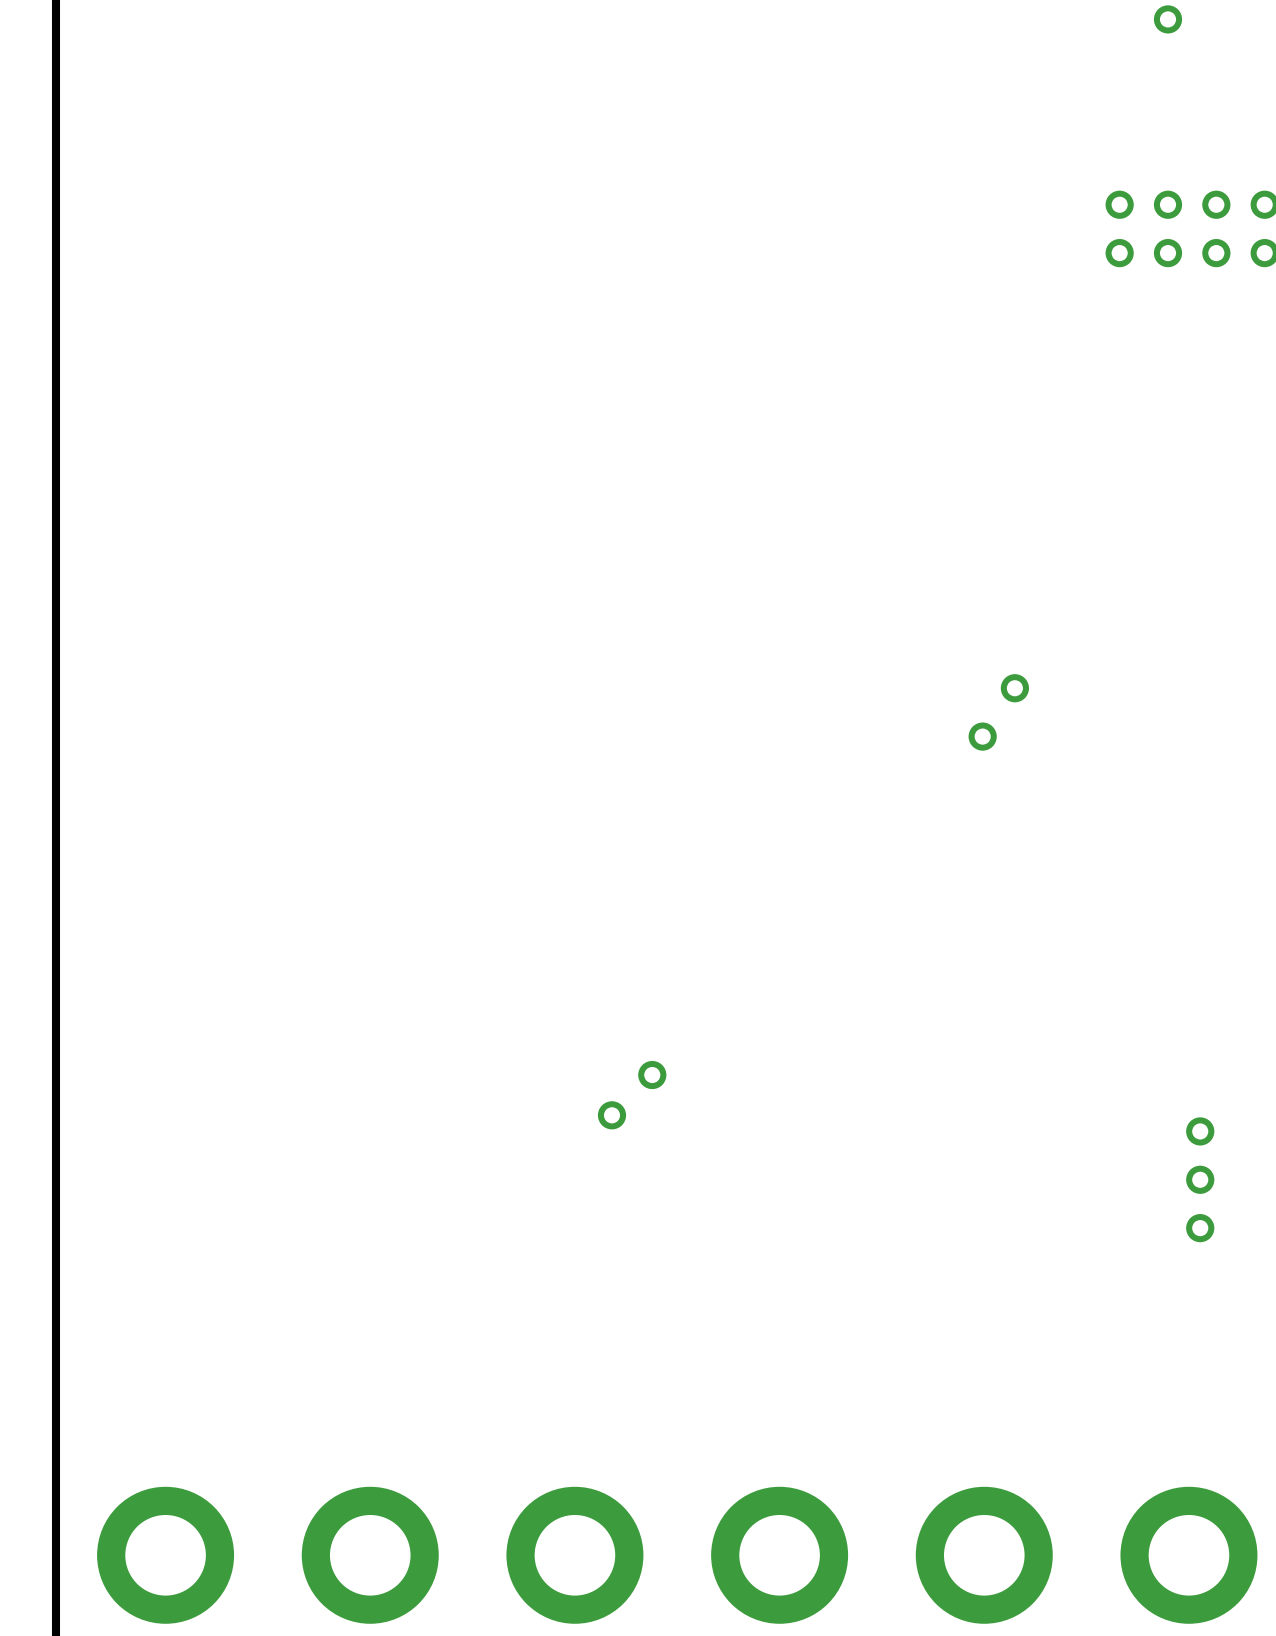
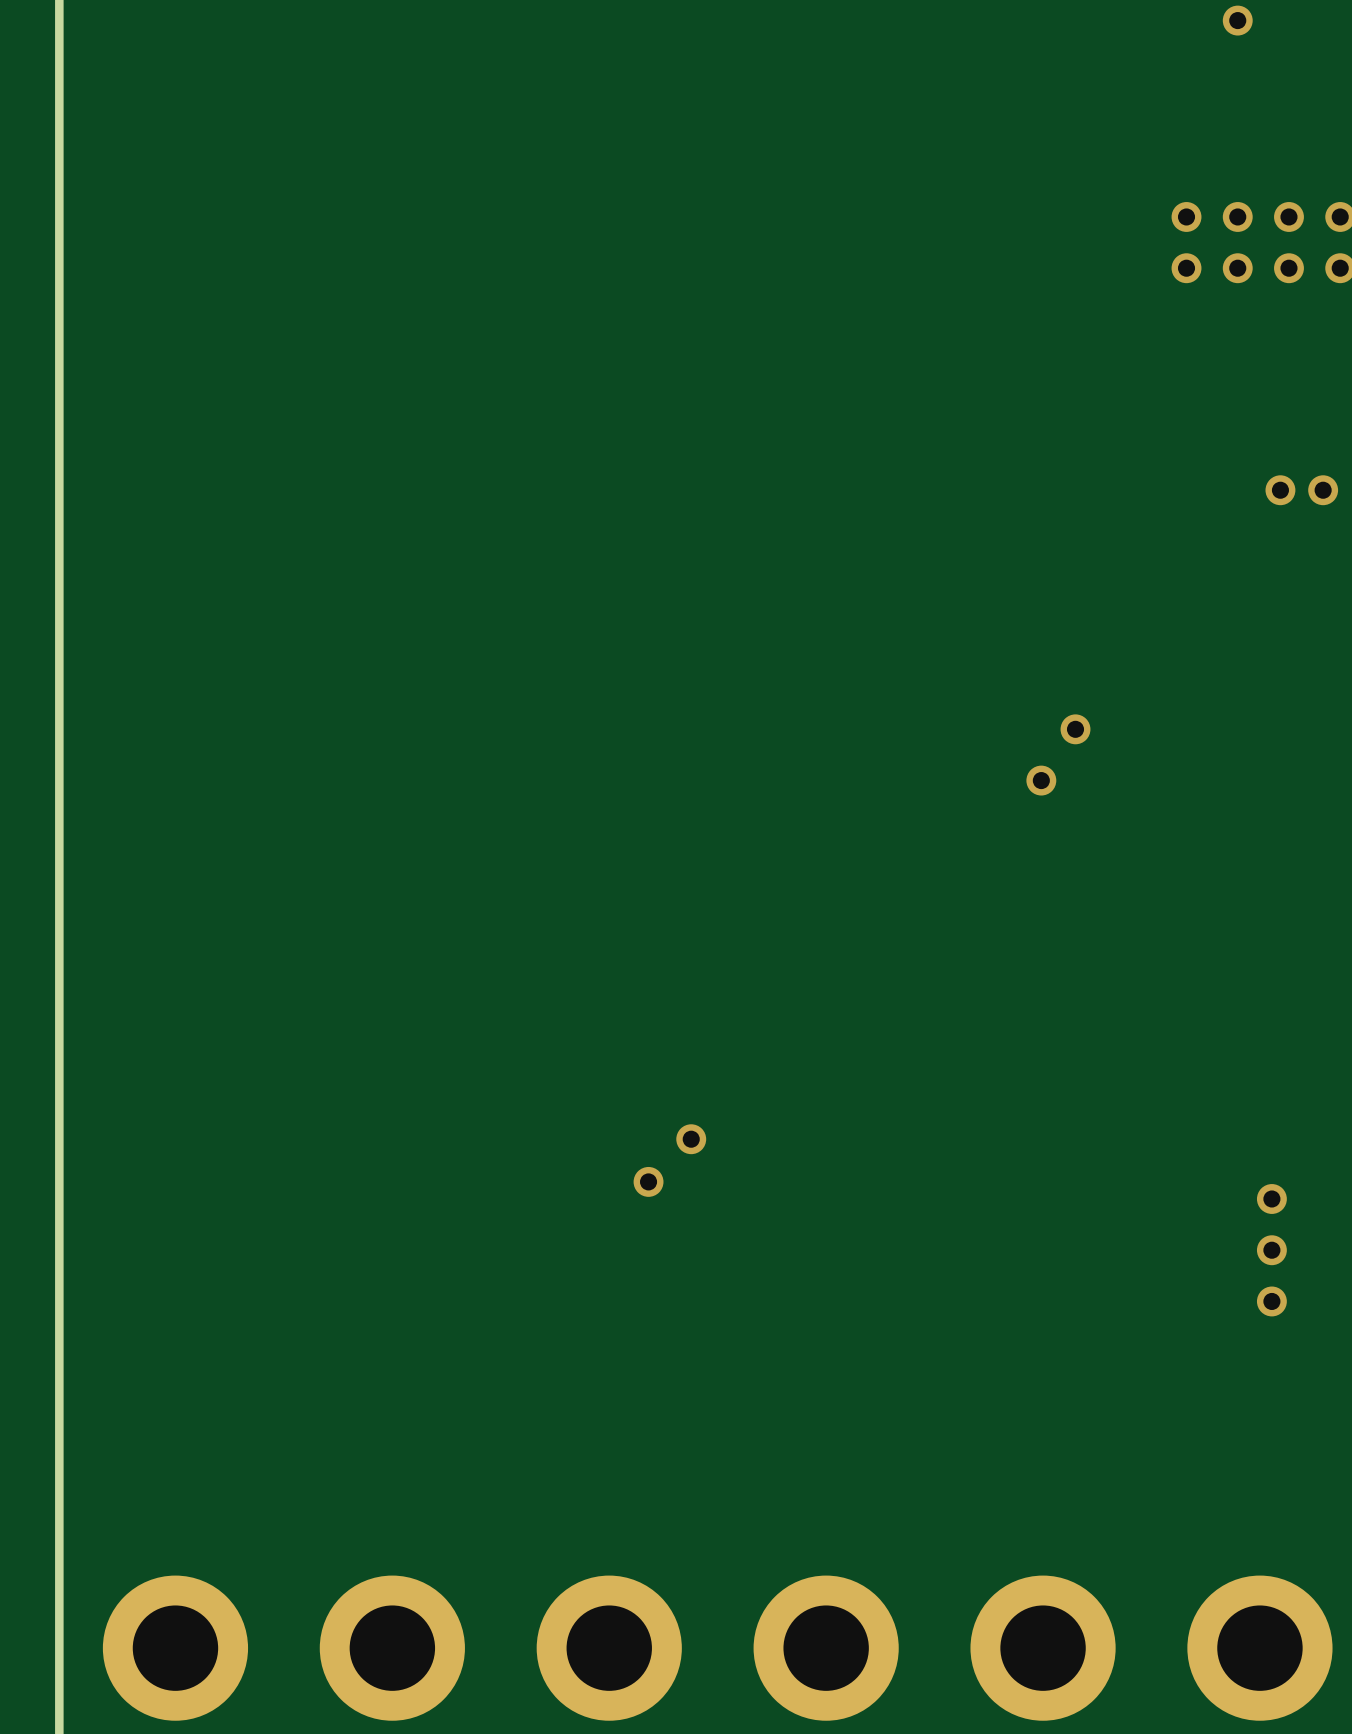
via: none -> (1280, 490)
via: none -> (1323, 490)

